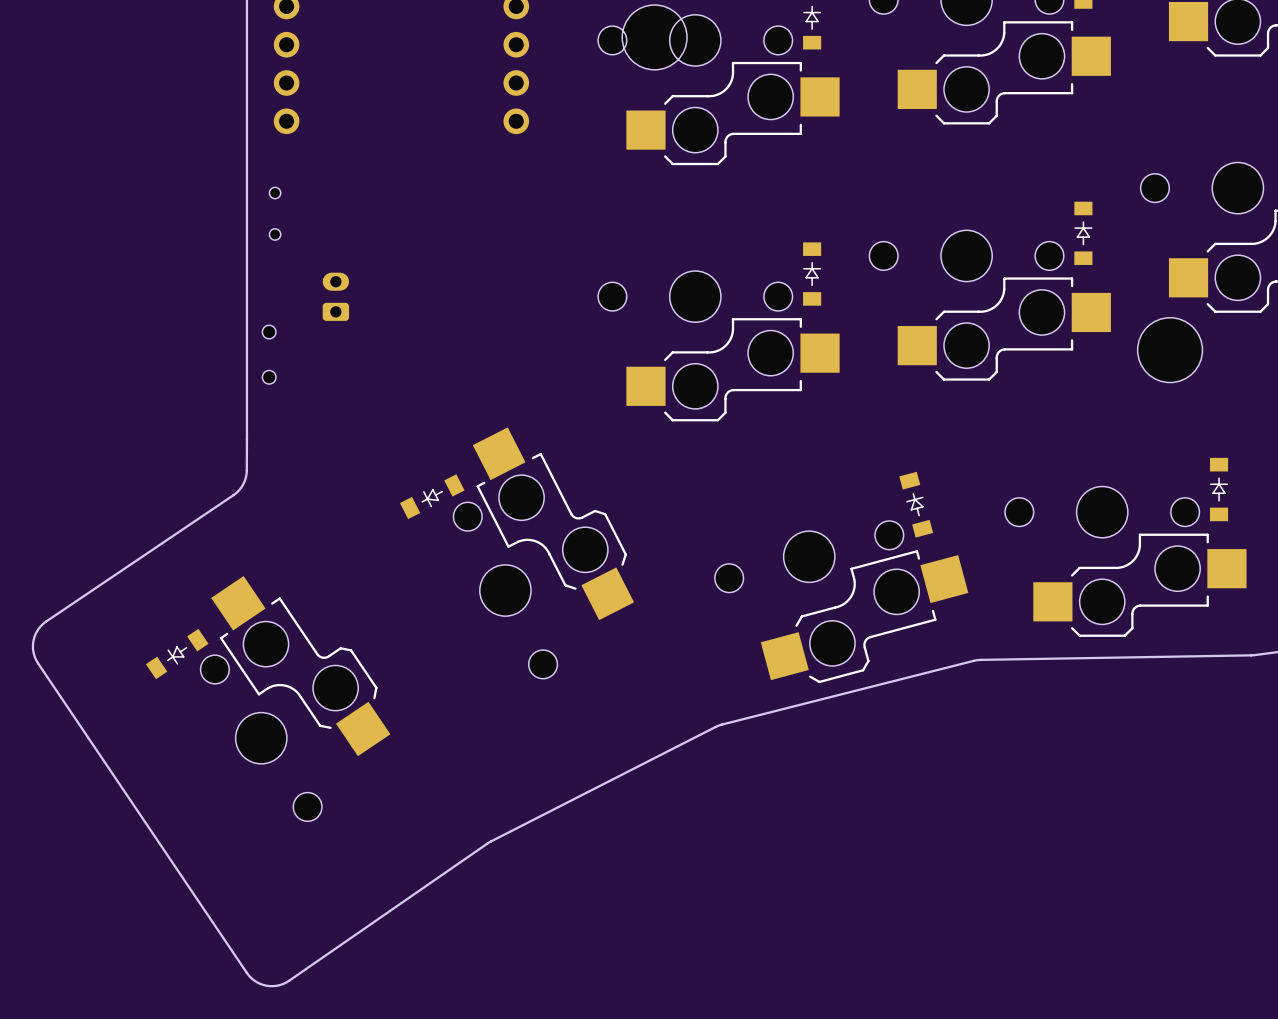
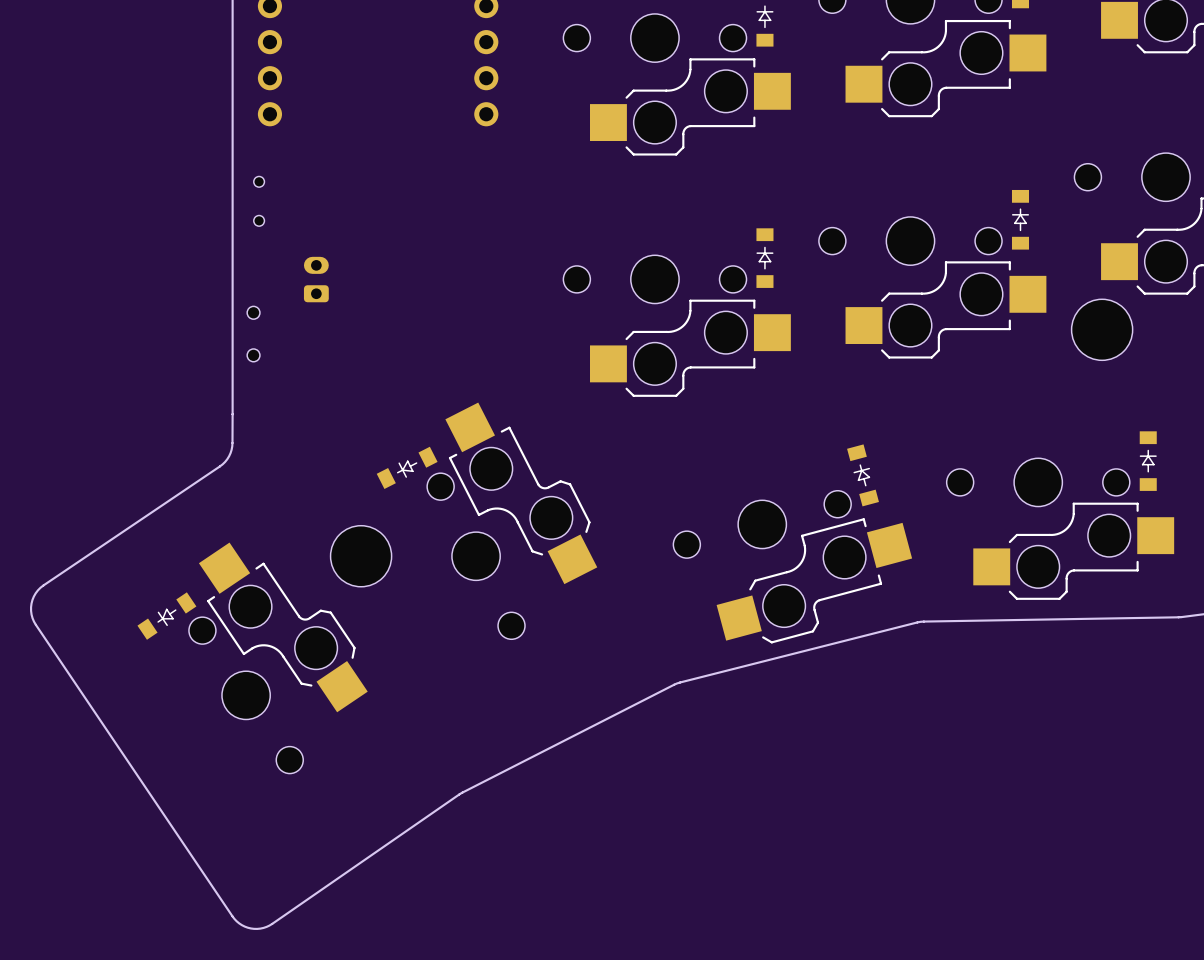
part: (654, 37) -> none
part: none -> (361, 556)

